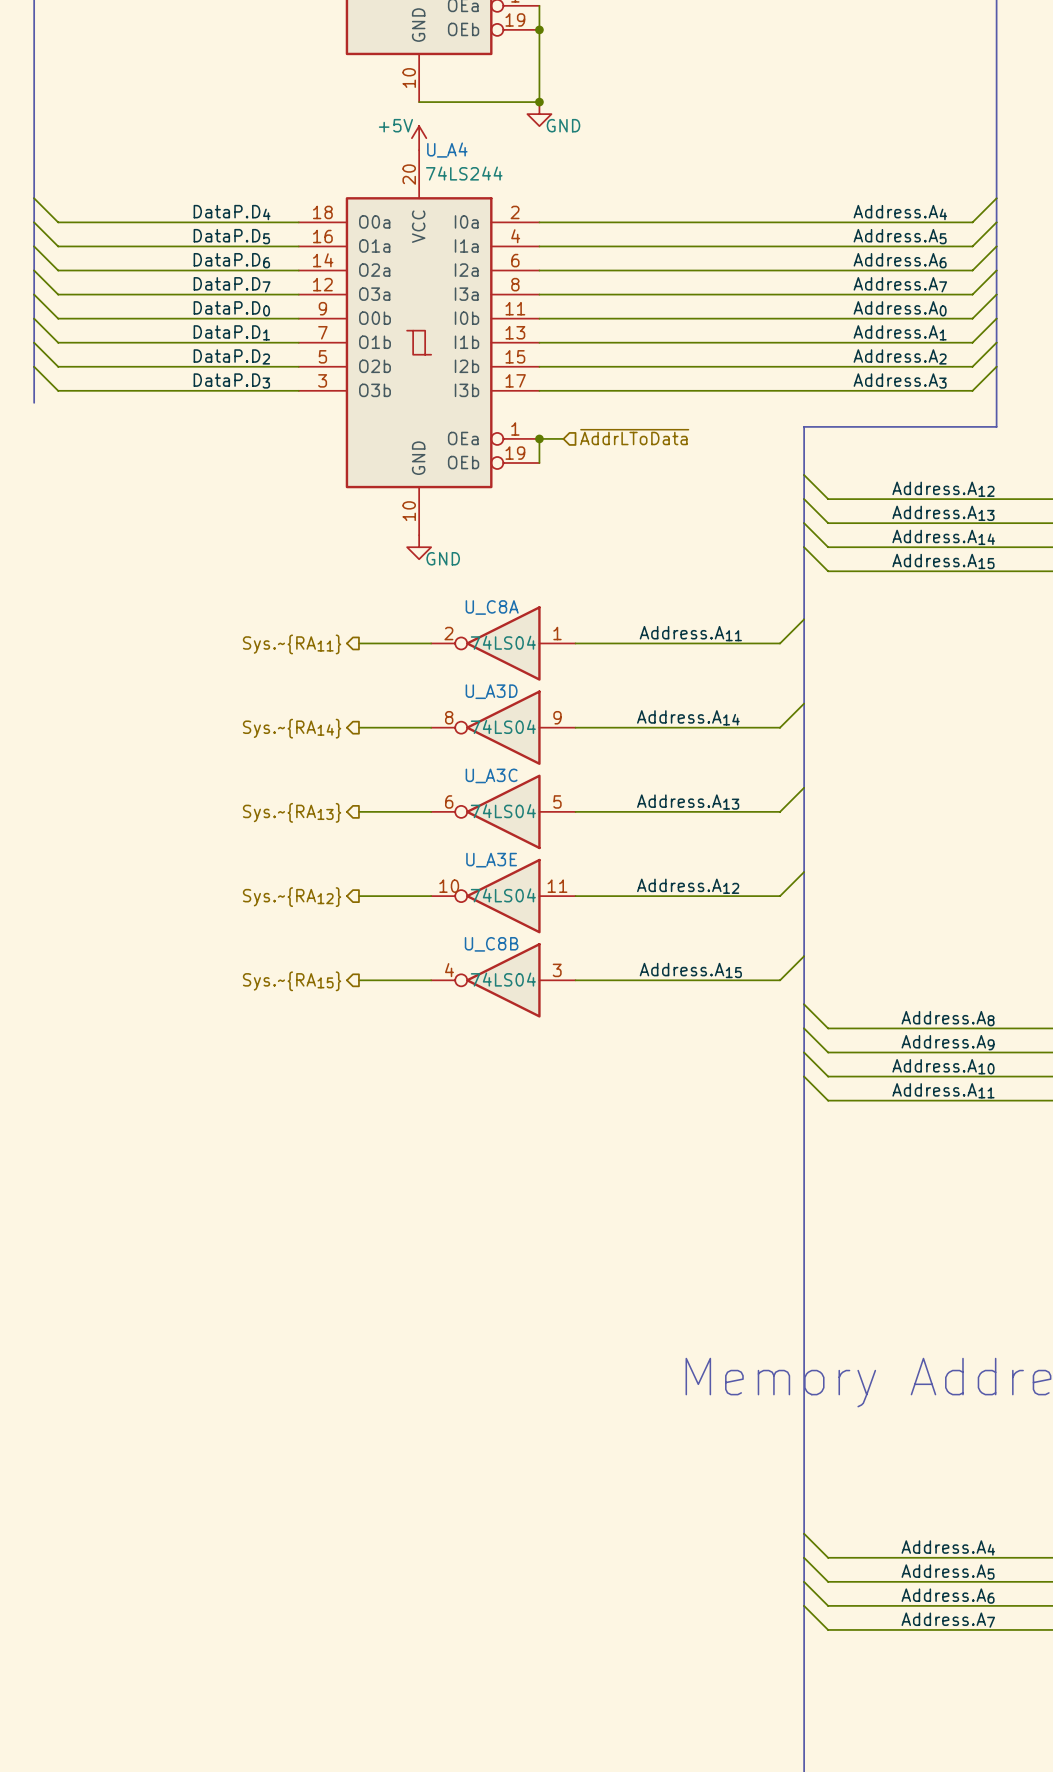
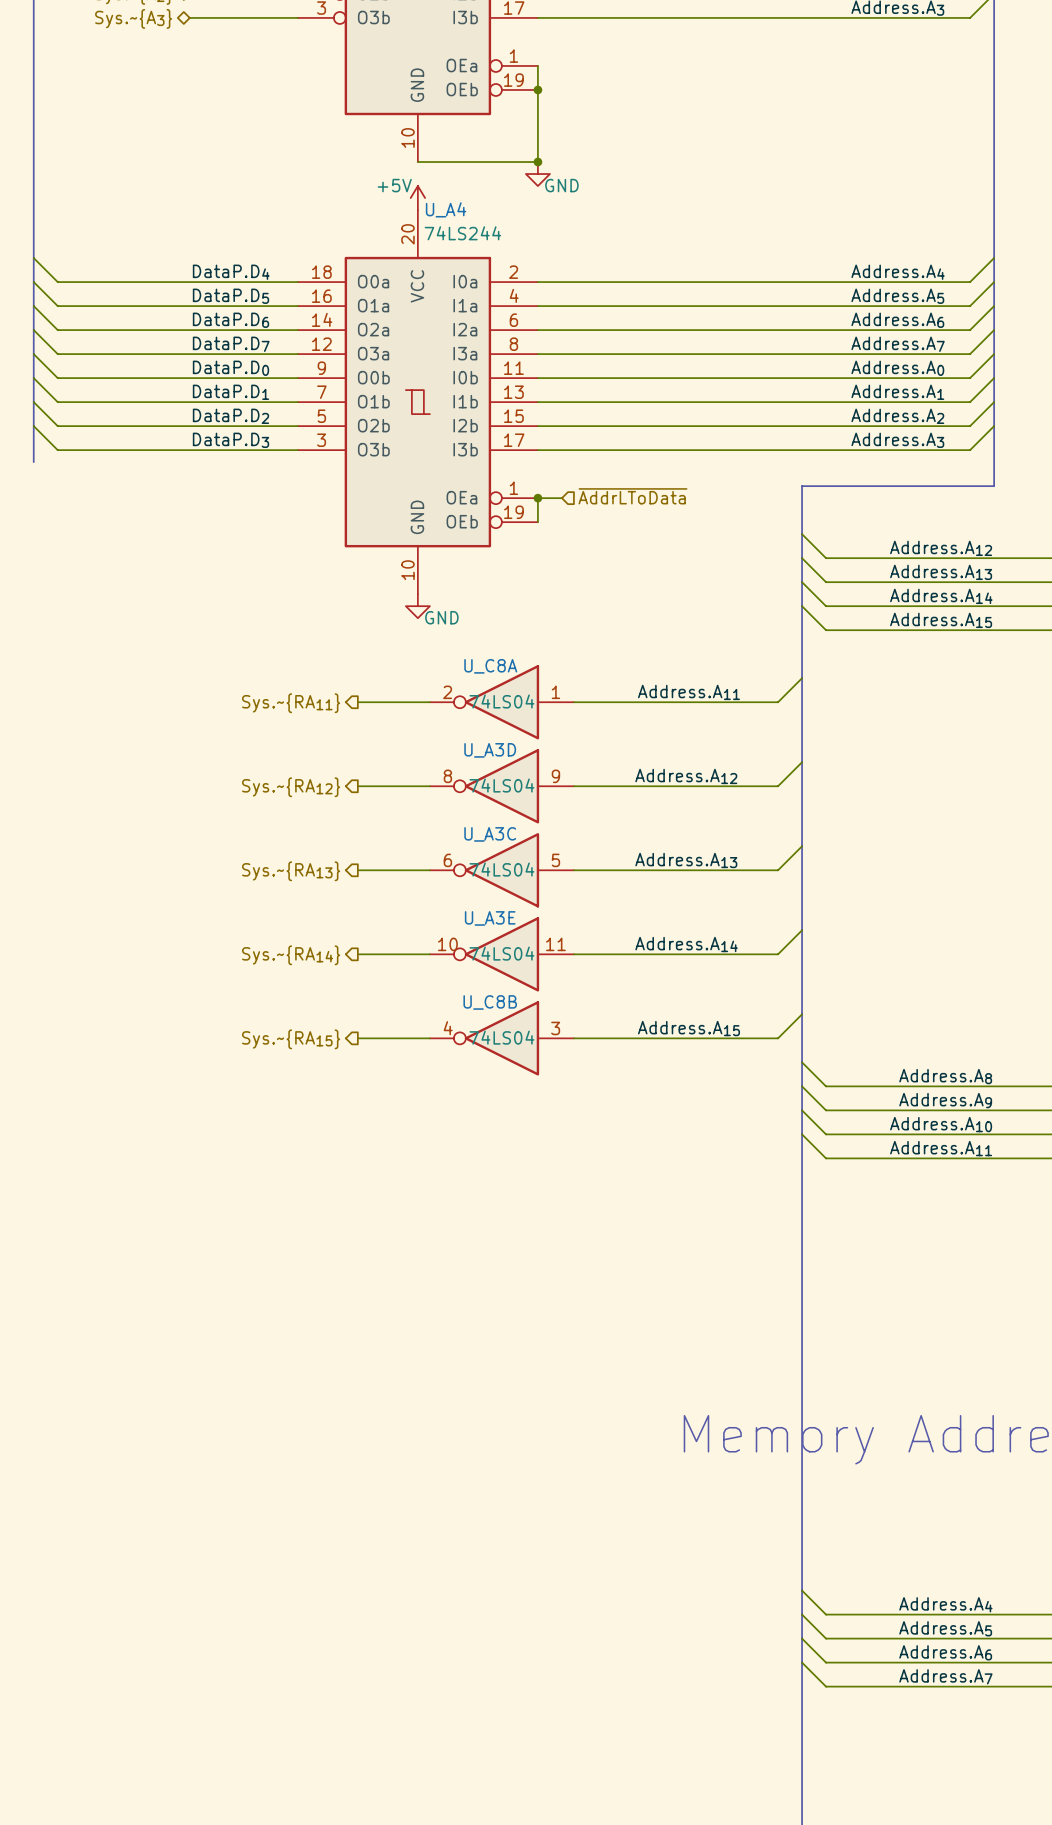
label: Address.A14 (688, 717) -> Address.A12 (686, 776)
hierarchical label: Sys.~{RA14} (292, 728) -> Sys.~{RA12} (291, 787)
label: Address.A12 (688, 886) -> Address.A14 (686, 944)
hierarchical label: Sys.~{RA12} (292, 897) -> Sys.~{RA14} (291, 955)

